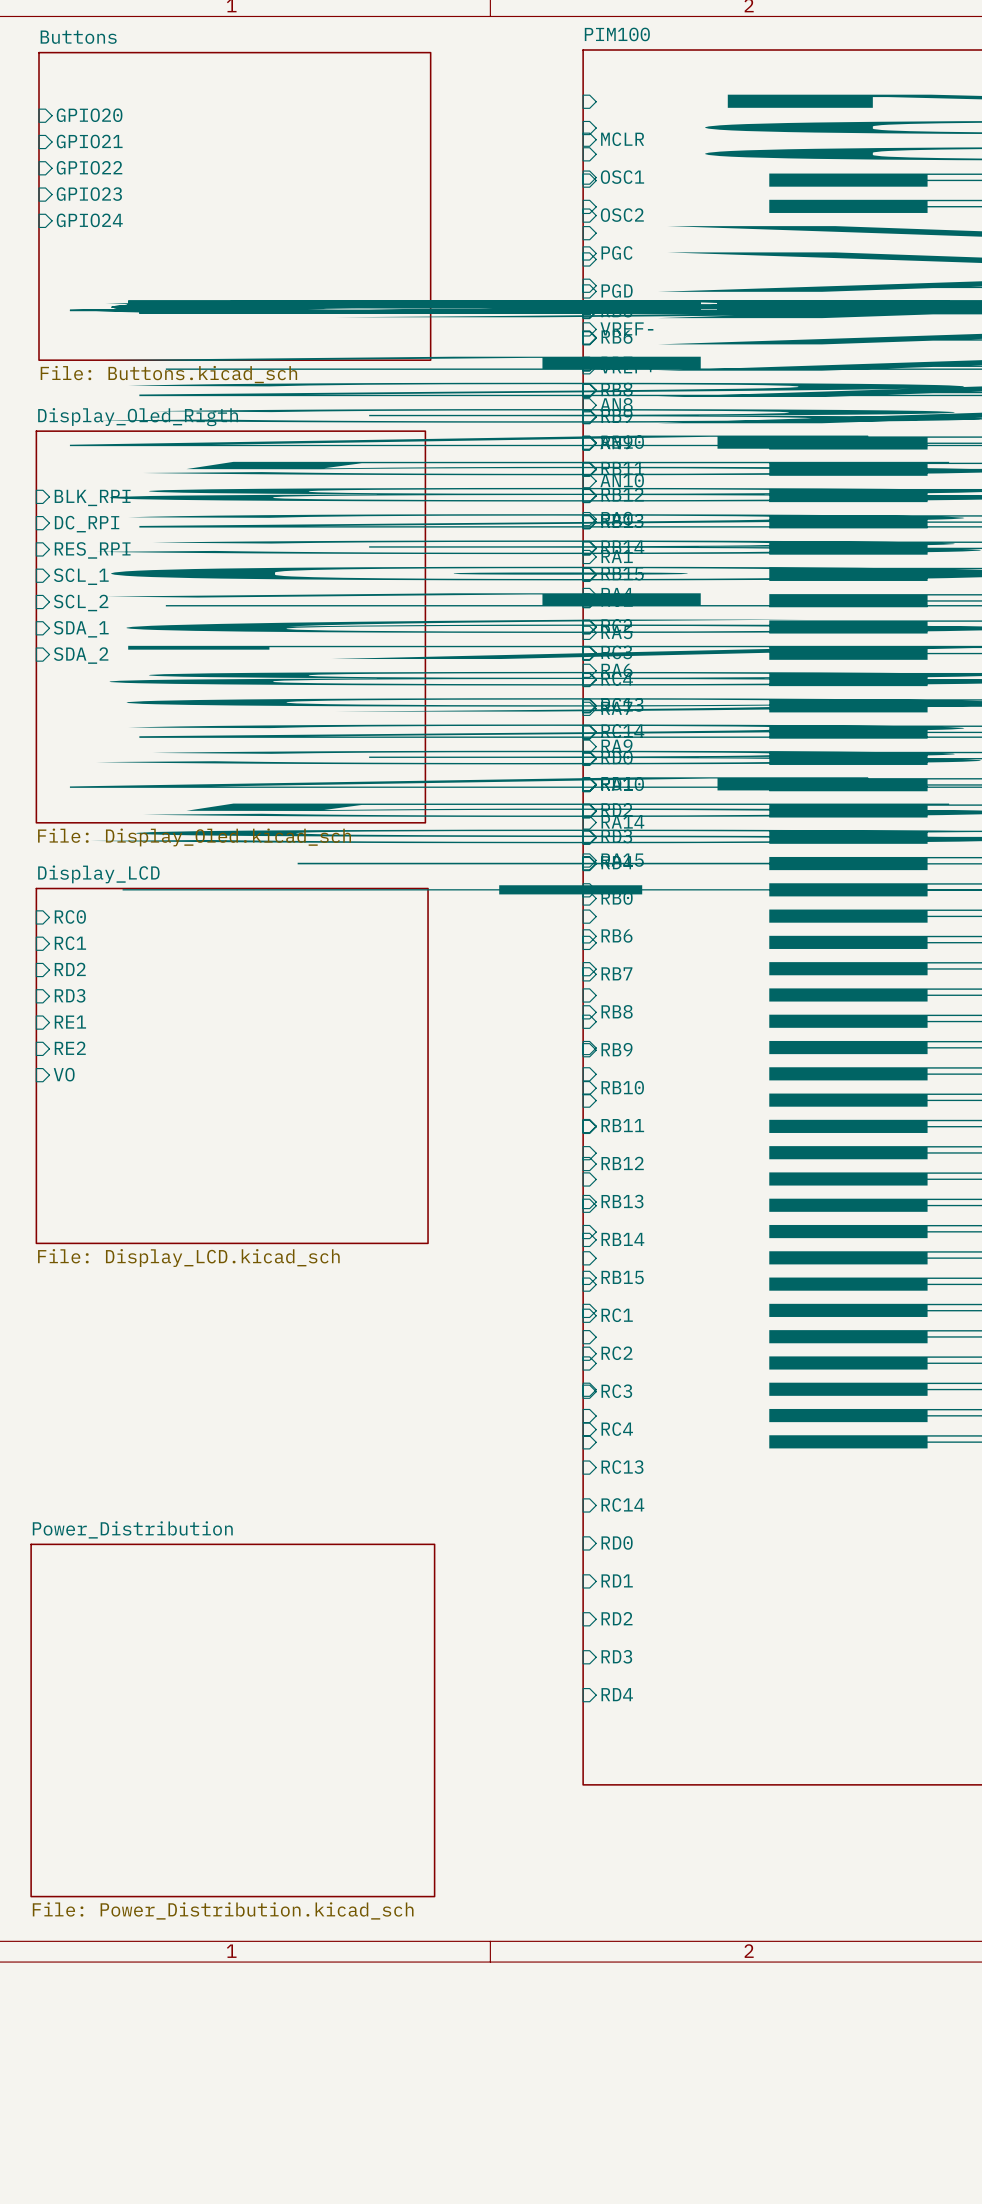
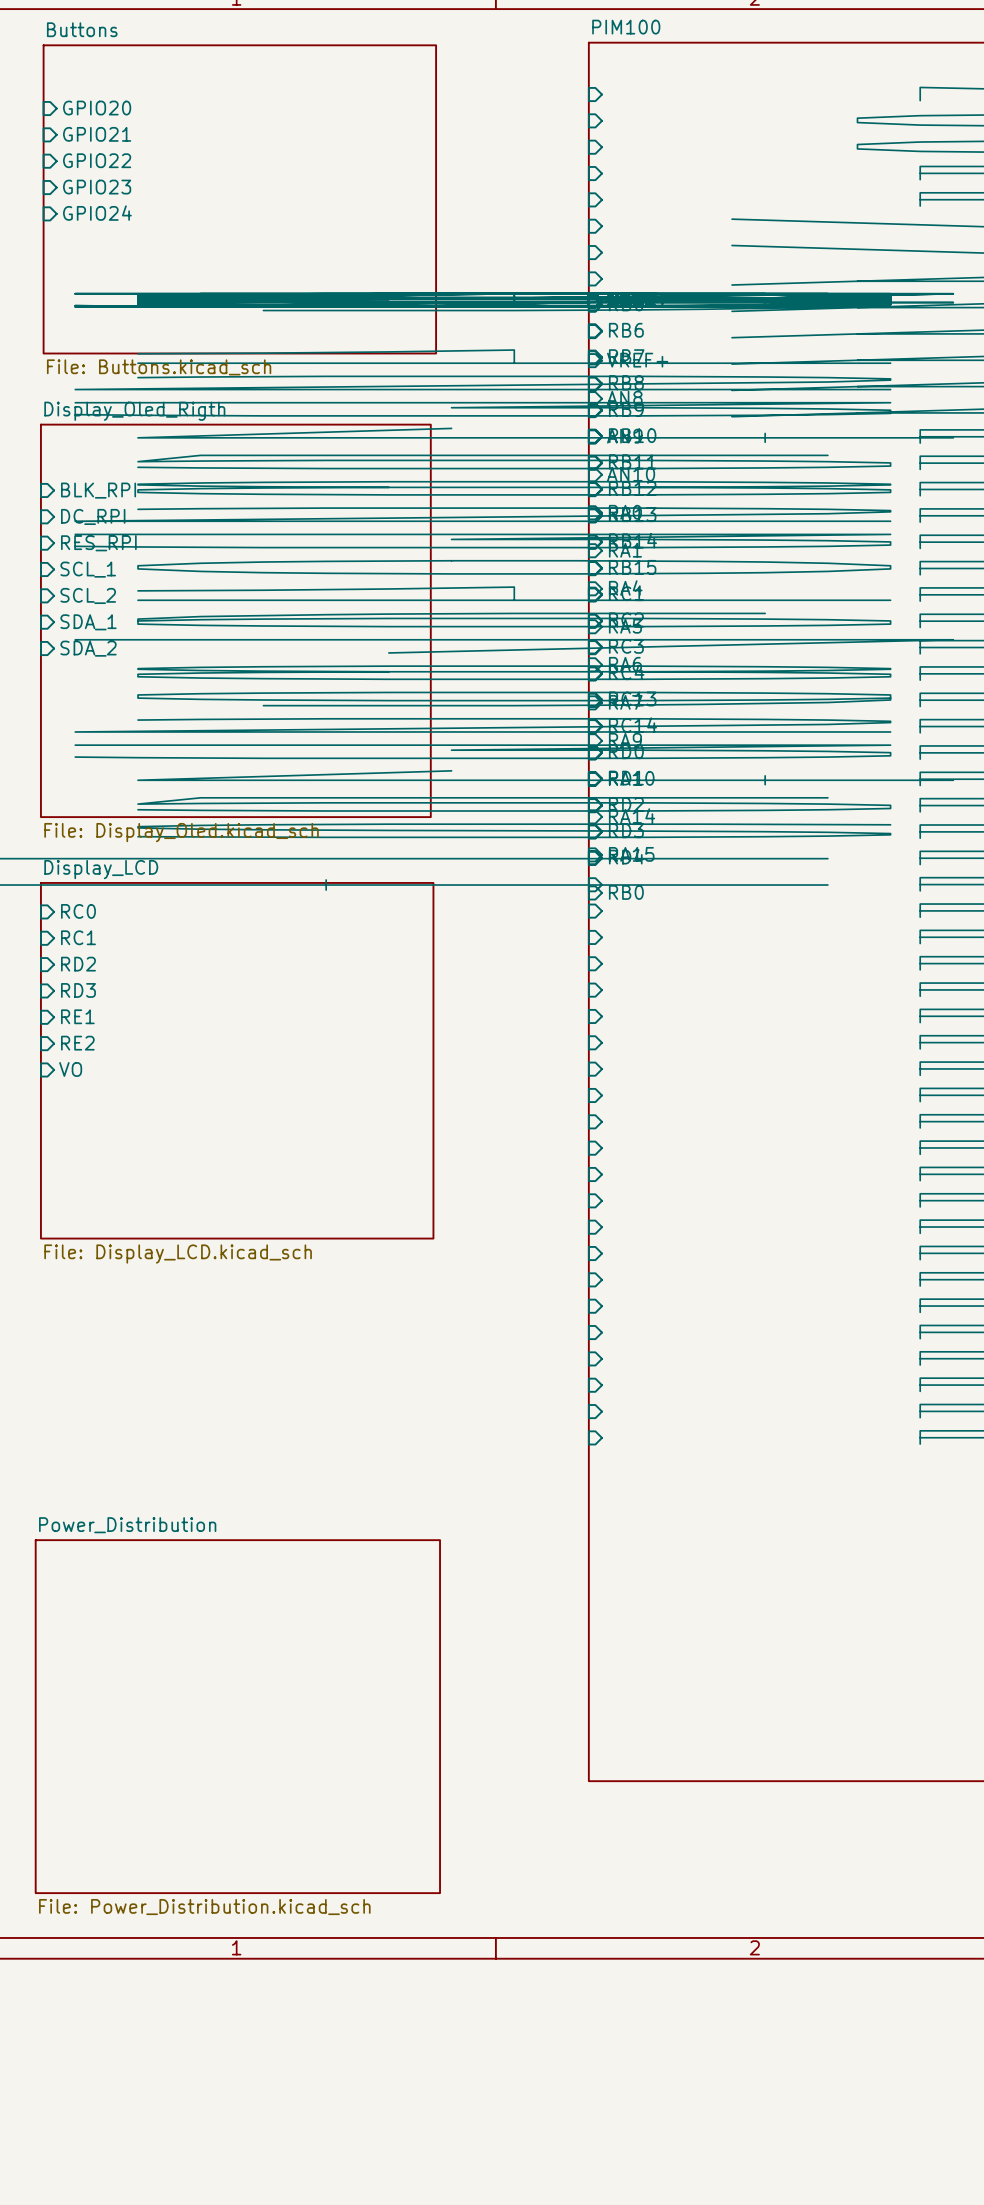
sheet pin: MCLR (622, 139) -> none
sheet pin: OSC1 (622, 177) -> none
sheet pin: OSC2 (622, 215) -> none
sheet pin: PGC (617, 252) -> none
sheet pin: PGD (617, 290) -> none
sheet pin: VREF- (626, 328) -> none
sheet pin: RB6 (617, 936) -> none
sheet pin: RB7 (616, 973) -> none
sheet pin: RB8 (617, 1011) -> none
sheet pin: RB9 (617, 1049) -> none
sheet pin: RB10 (622, 1087) -> none
sheet pin: RB11 (622, 1125) -> none
sheet pin: RB12 (622, 1163) -> none
sheet pin: RB13 (622, 1201) -> none
sheet pin: RB14 (622, 1239) -> none
sheet pin: RB15 (622, 1277) -> none
sheet pin: RC1 (617, 1315) -> none
sheet pin: RC2 (617, 1353) -> none
sheet pin: RC3 (616, 1391) -> none
sheet pin: RC4 (617, 1429) -> none
sheet pin: RC13 (622, 1467) -> none
sheet pin: RC14 (622, 1504) -> none
sheet pin: RD0 (617, 1542) -> none
sheet pin: RD1 (617, 1580) -> none
sheet pin: RD2 (617, 1618) -> none
sheet pin: RD3 (616, 1656) -> none
sheet pin: RD4 (617, 1694) -> none

